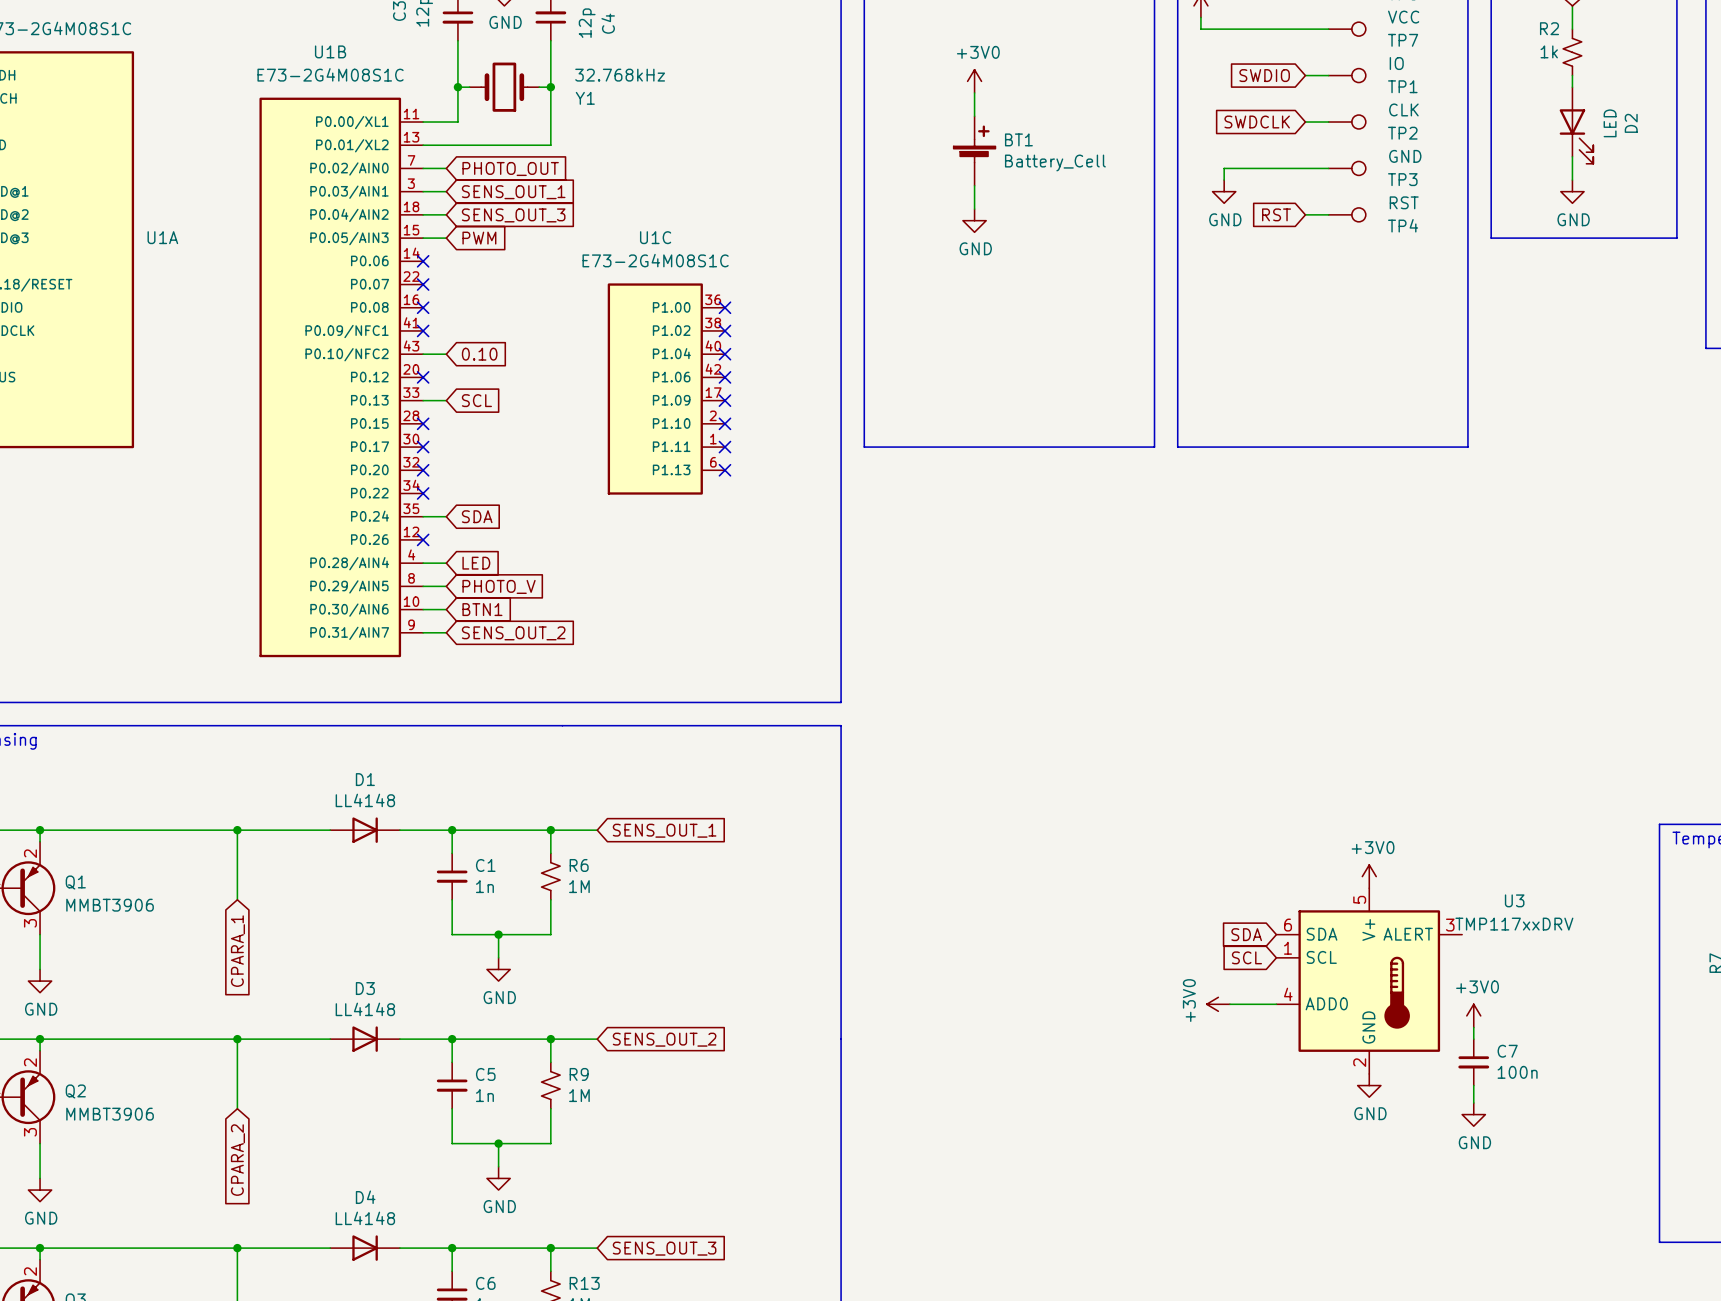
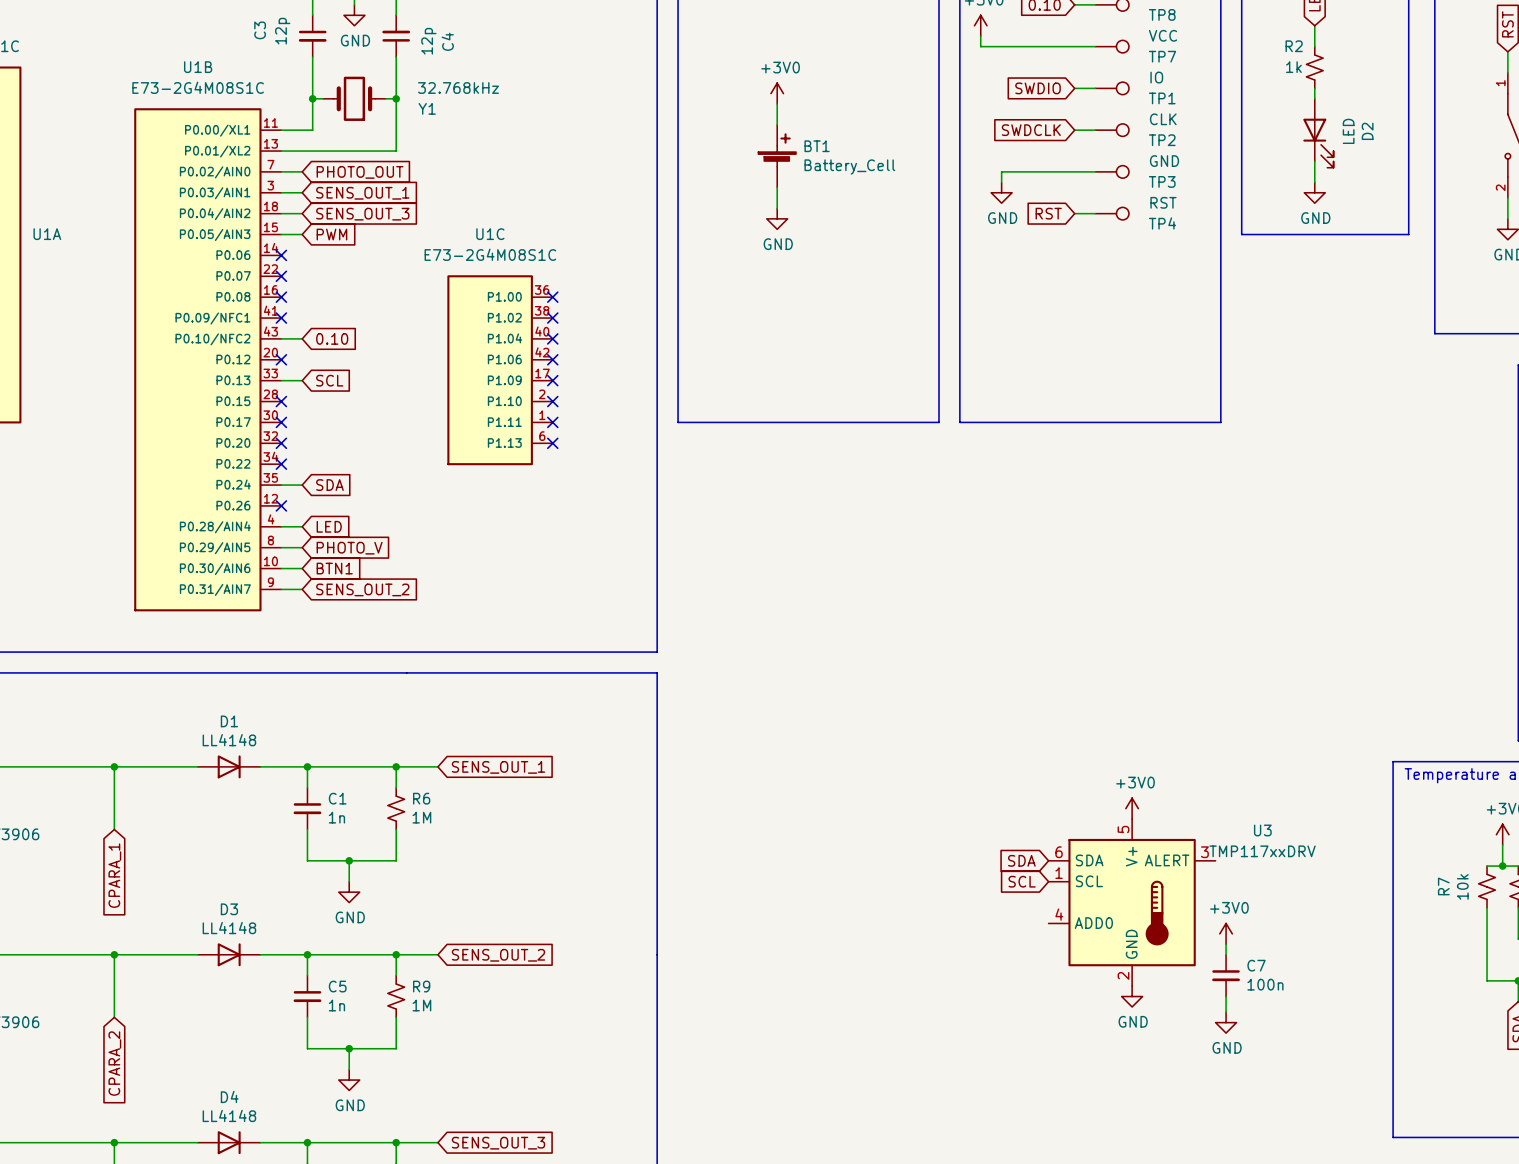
power symbol: +3V0 (1218, 1004) -> none
wire: (1229, 1004) (1276, 1004) -> none

